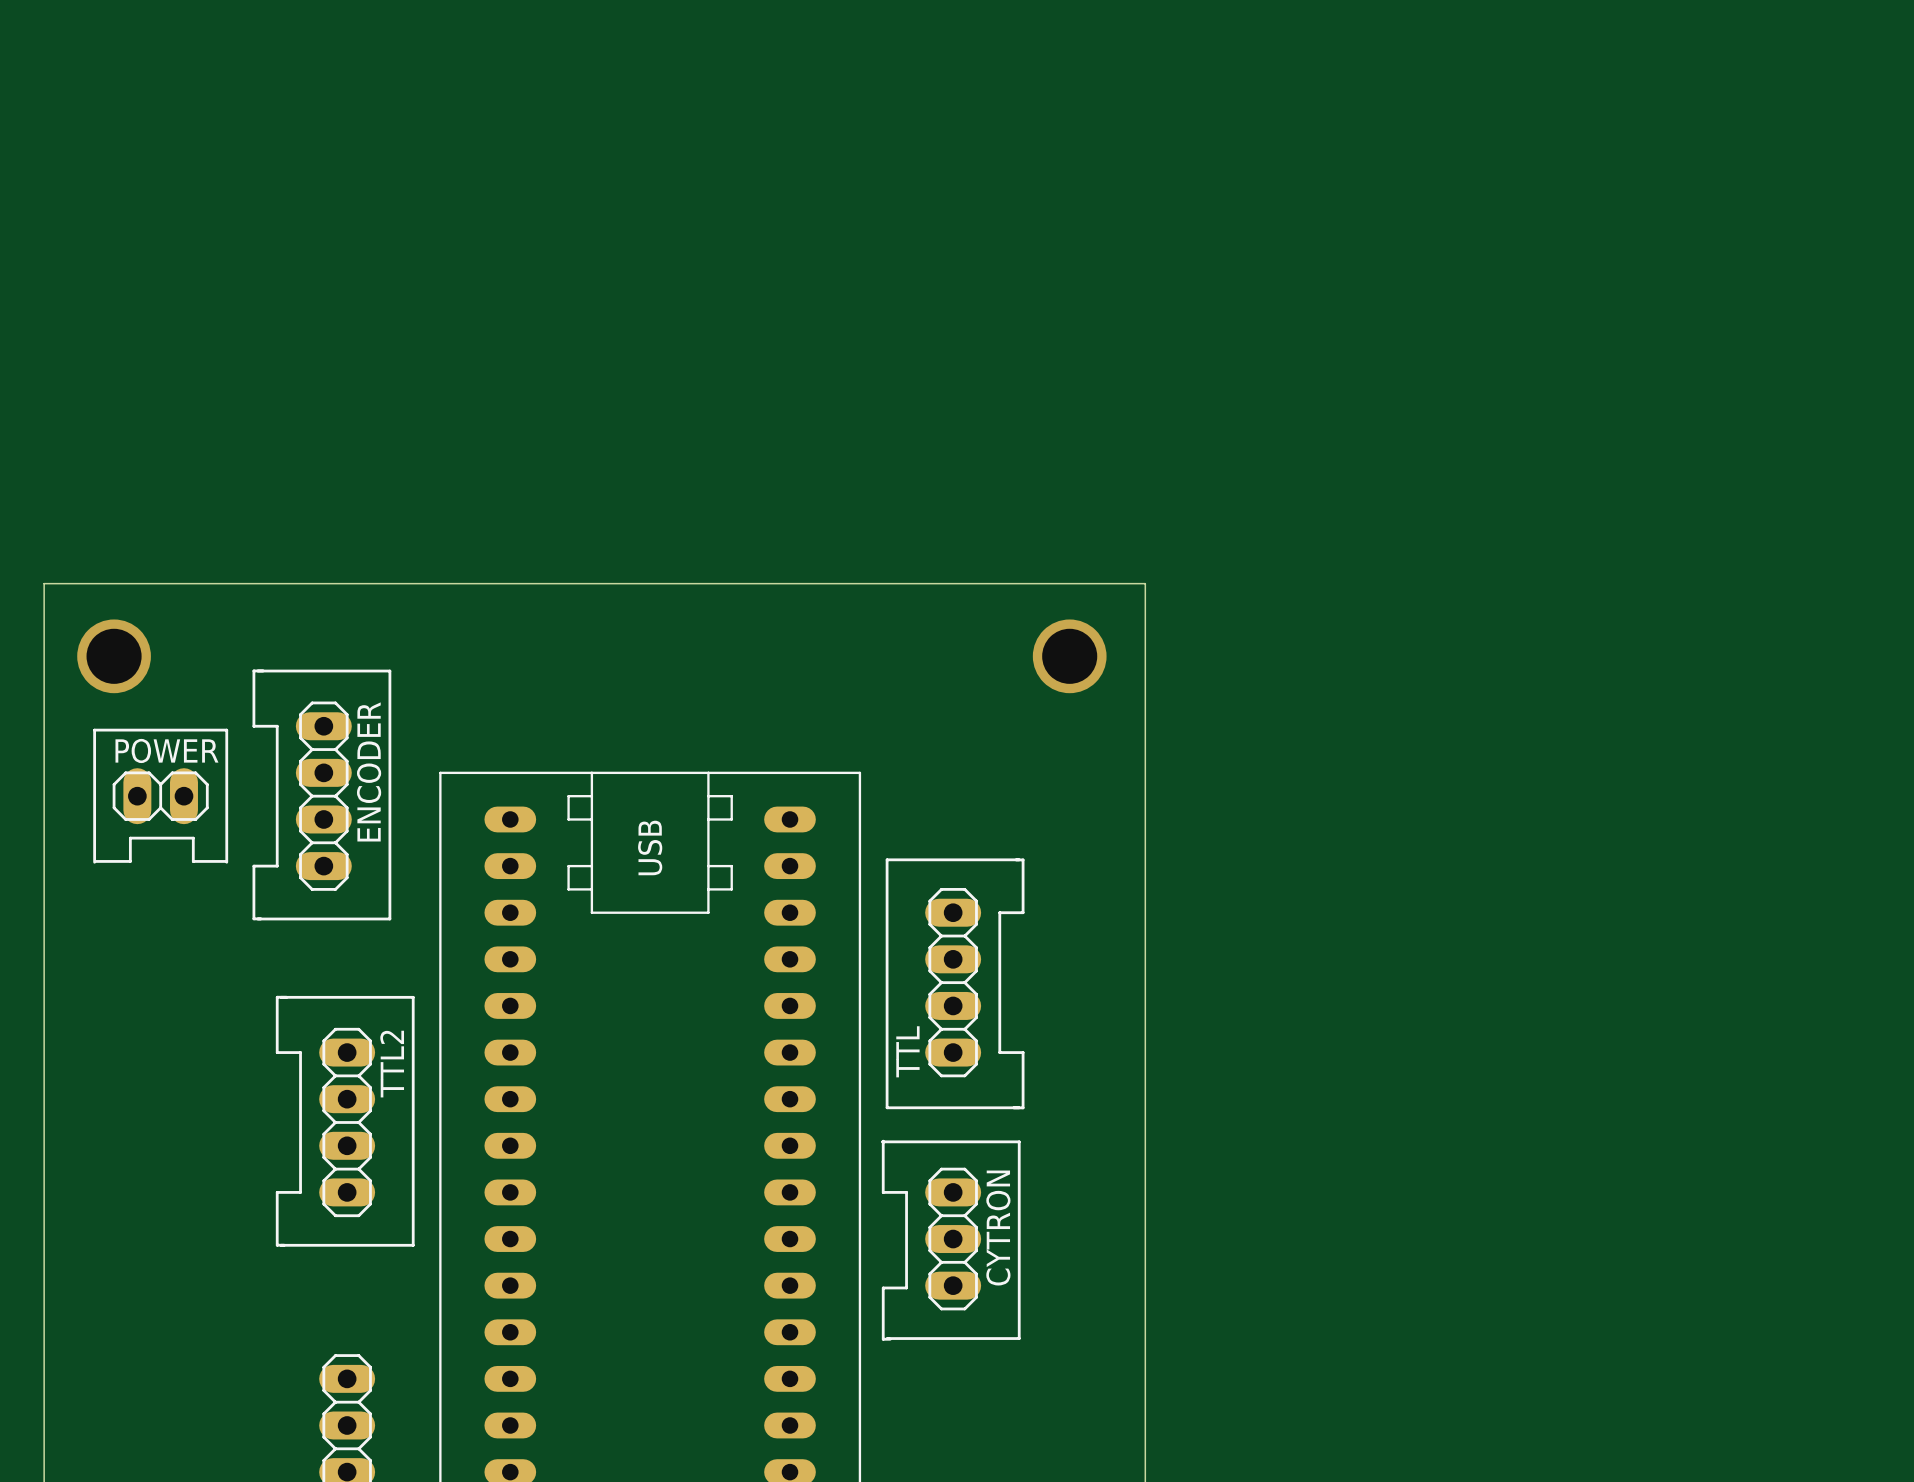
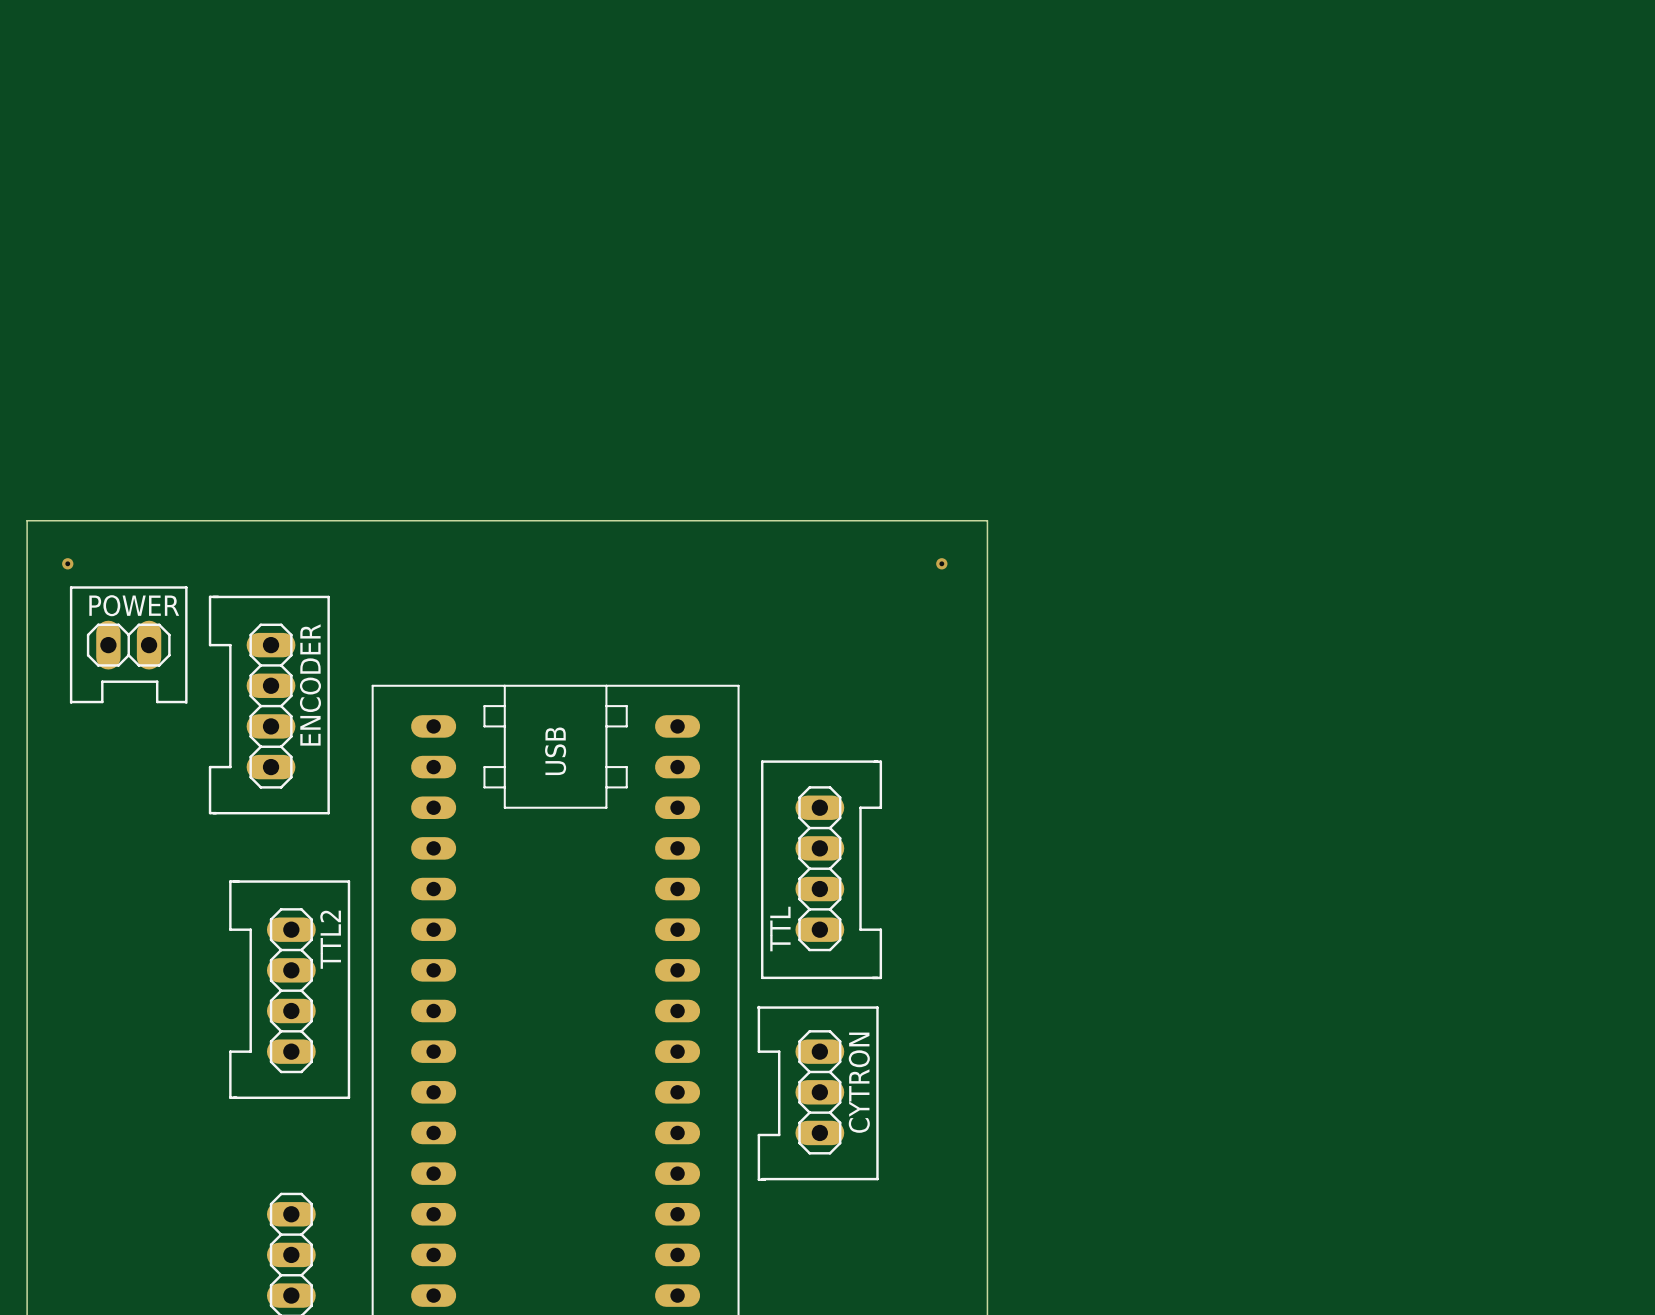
via: none -> (67, 563)
via: none -> (941, 563)
via: (114, 656) -> none
via: (1069, 656) -> none
POWER position: (160, 796) -> (128, 645)

